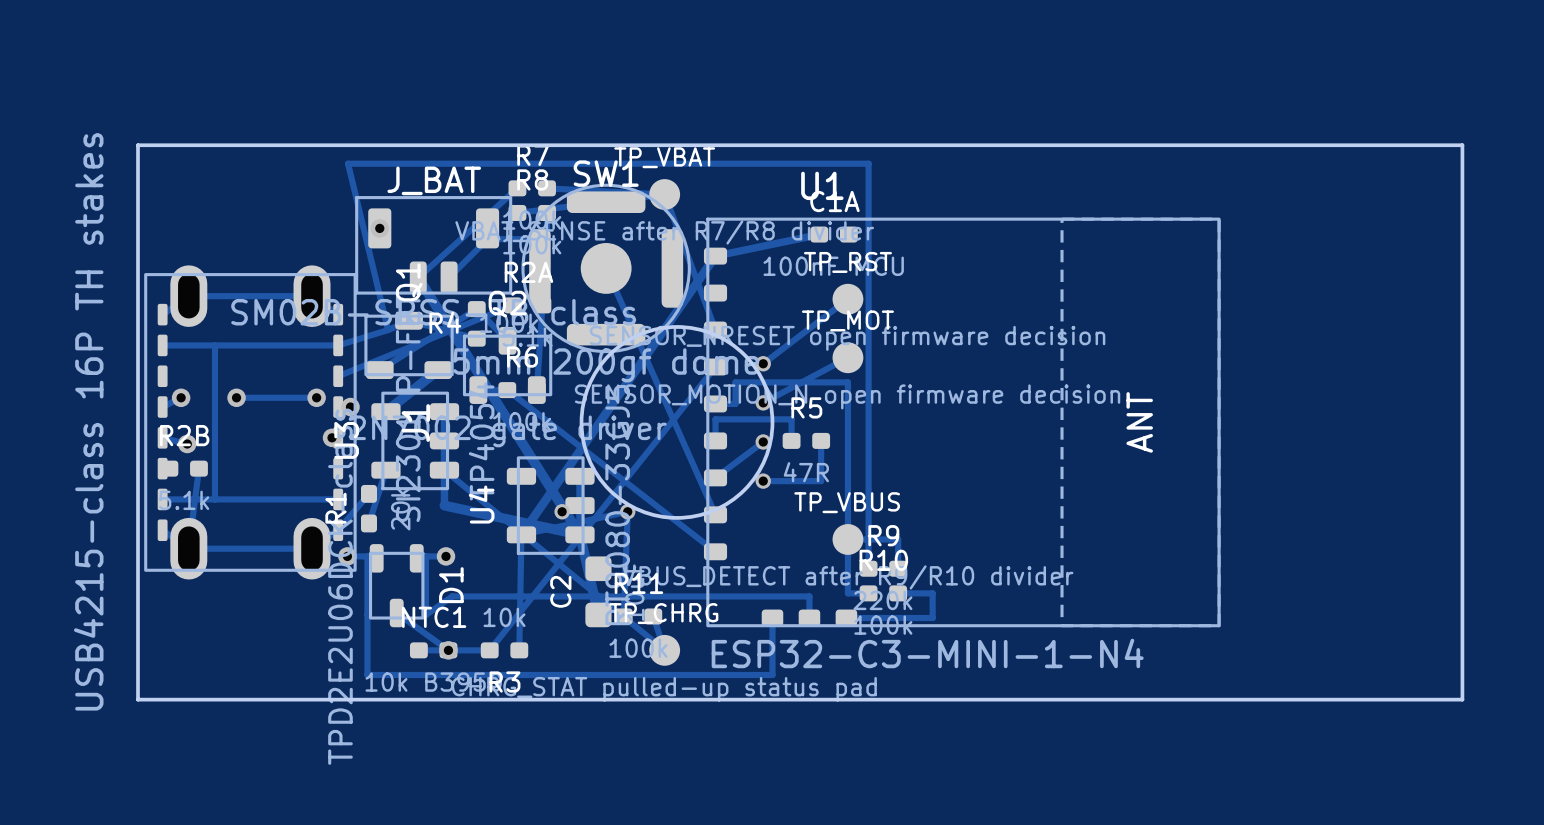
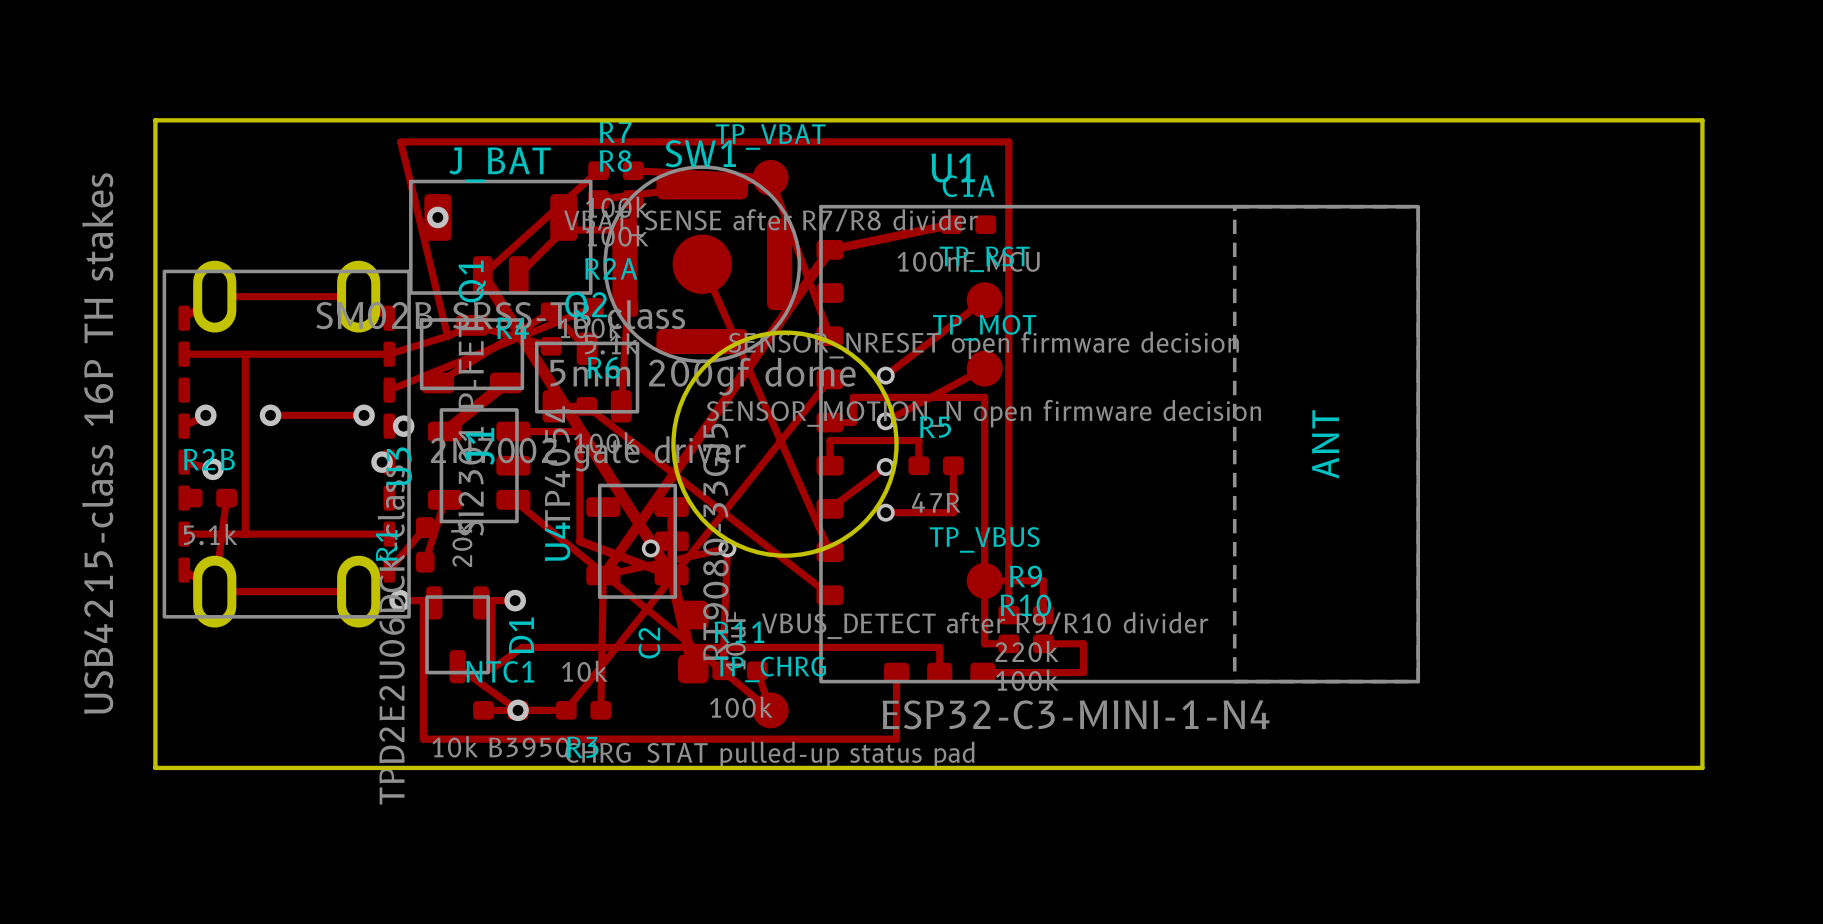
track: (444, 411) (444, 505) (579, 534) -> (513, 431) (579, 431) (579, 541) (671, 575)

